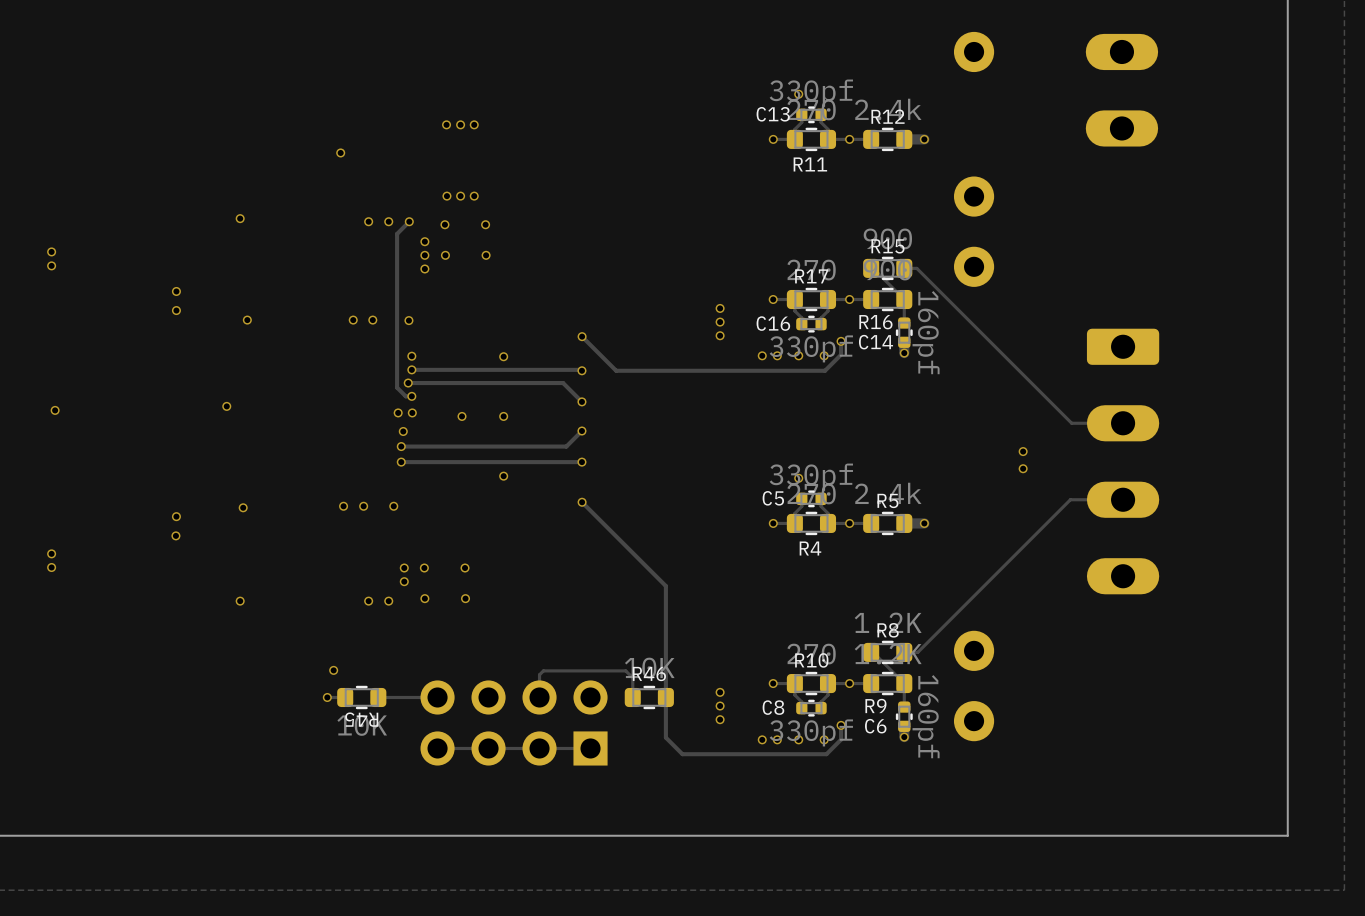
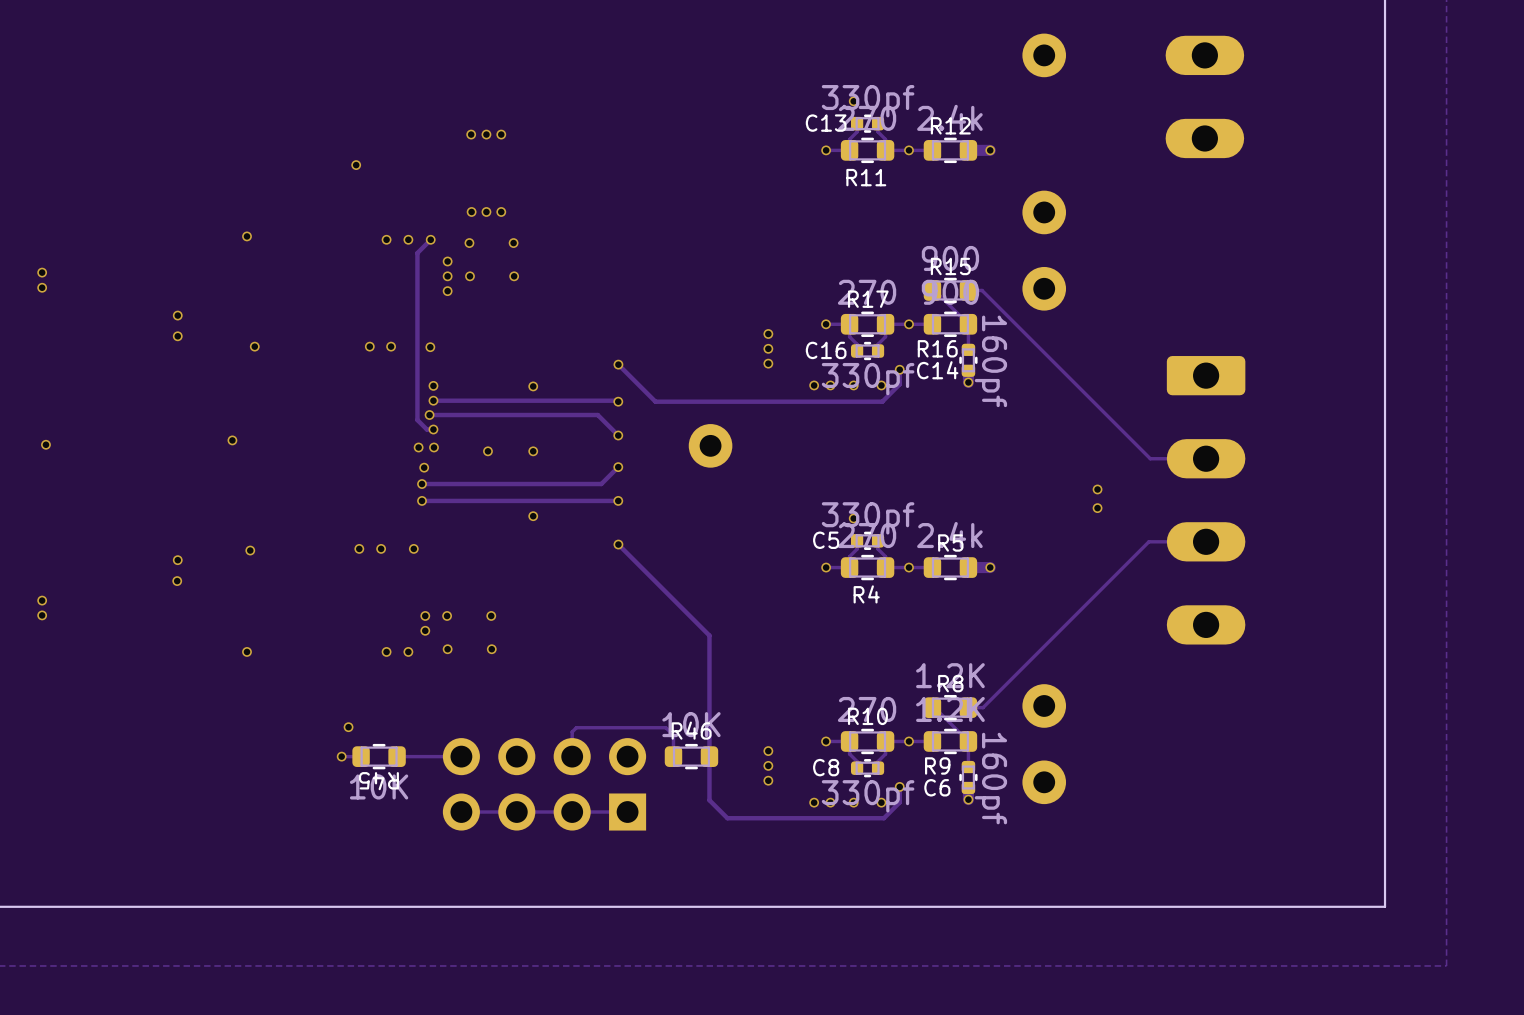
part: none -> (710, 445)

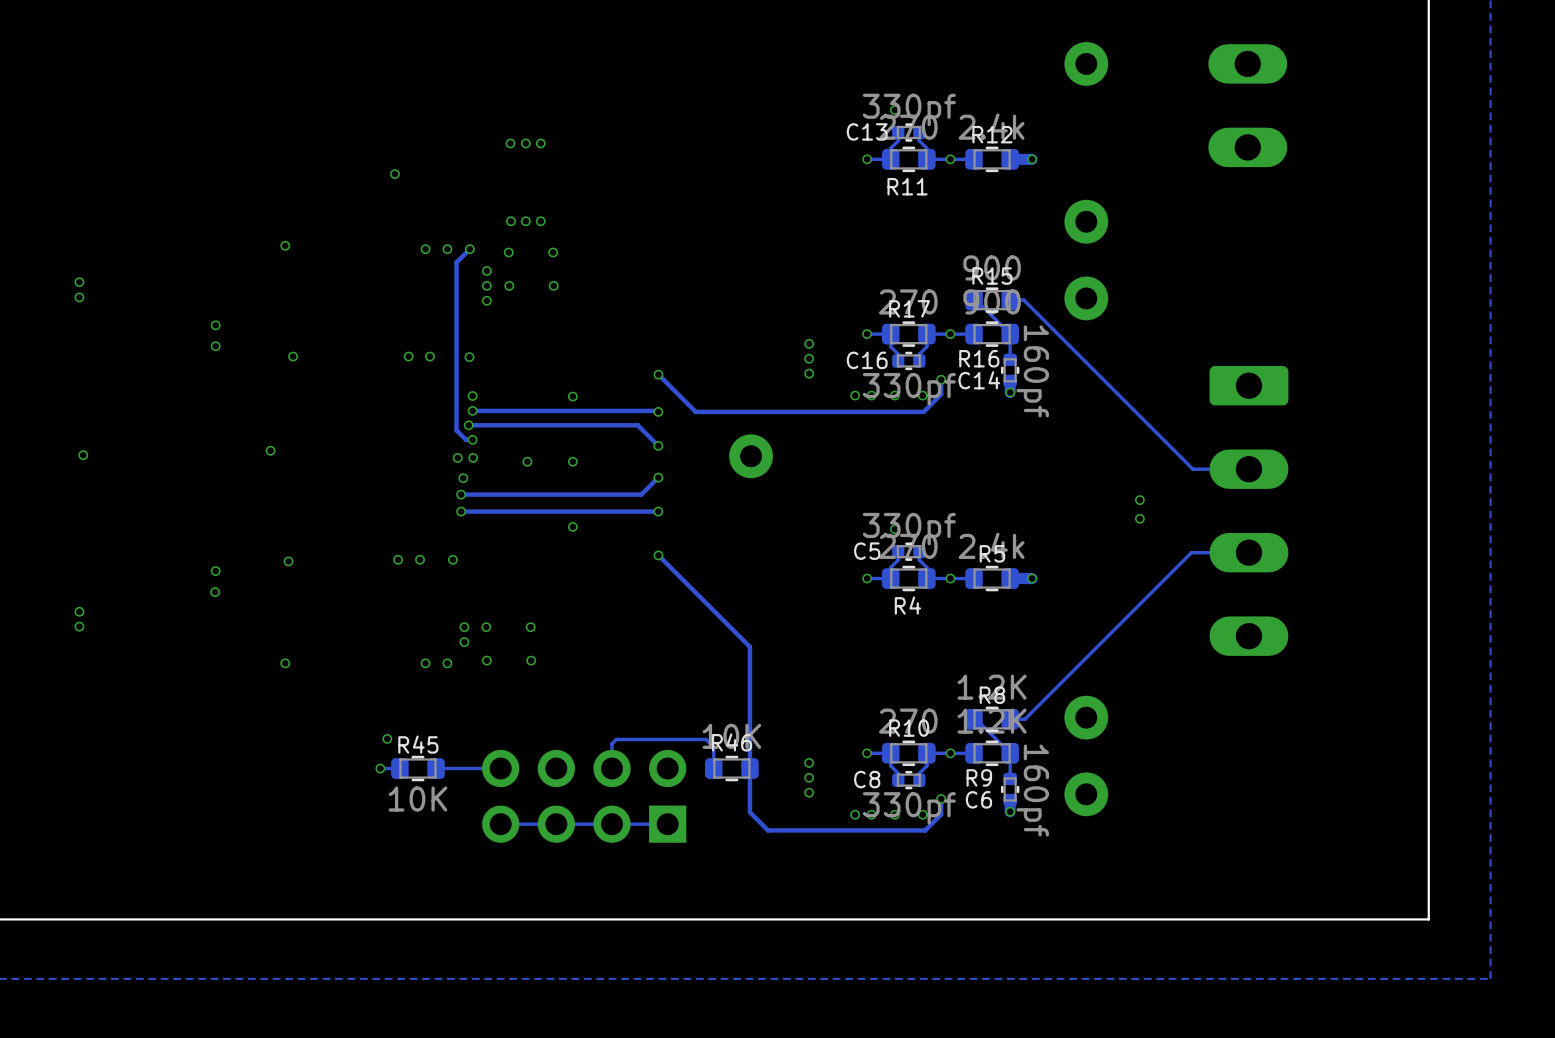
R45 name rotation: 0° (378, 781) -> 180° (418, 744)

